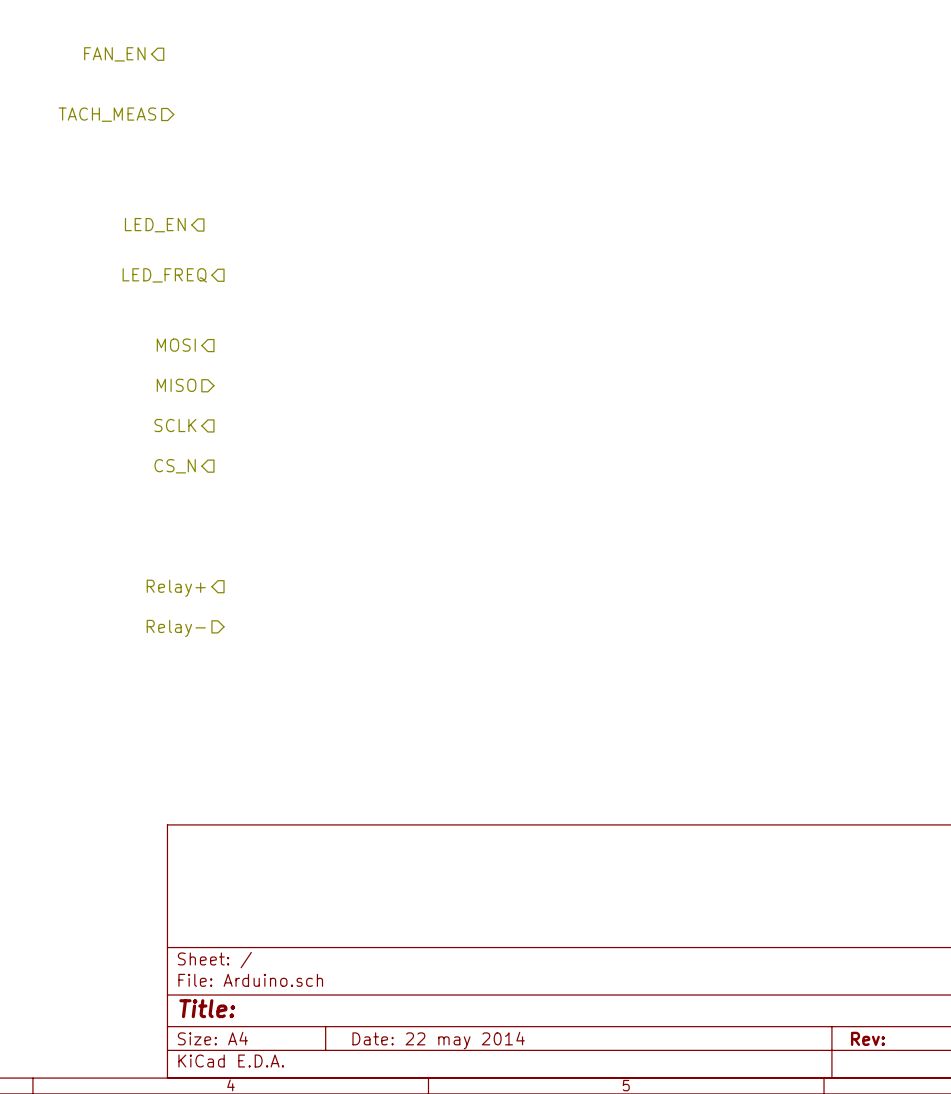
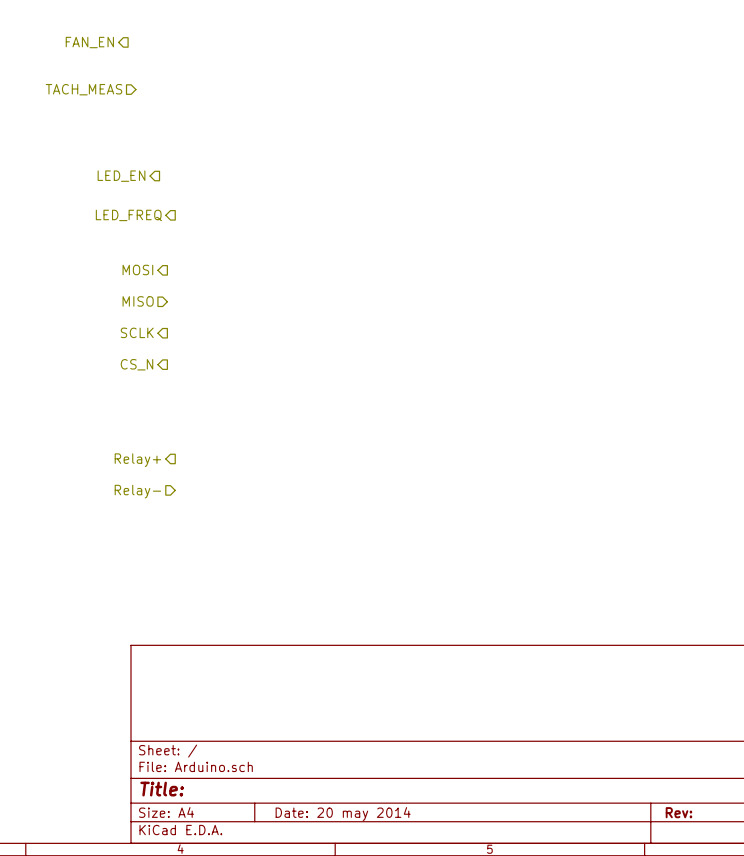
title block: Date: 22 may 2014 (438, 1040) -> Date: 20 may 2014 (343, 814)

